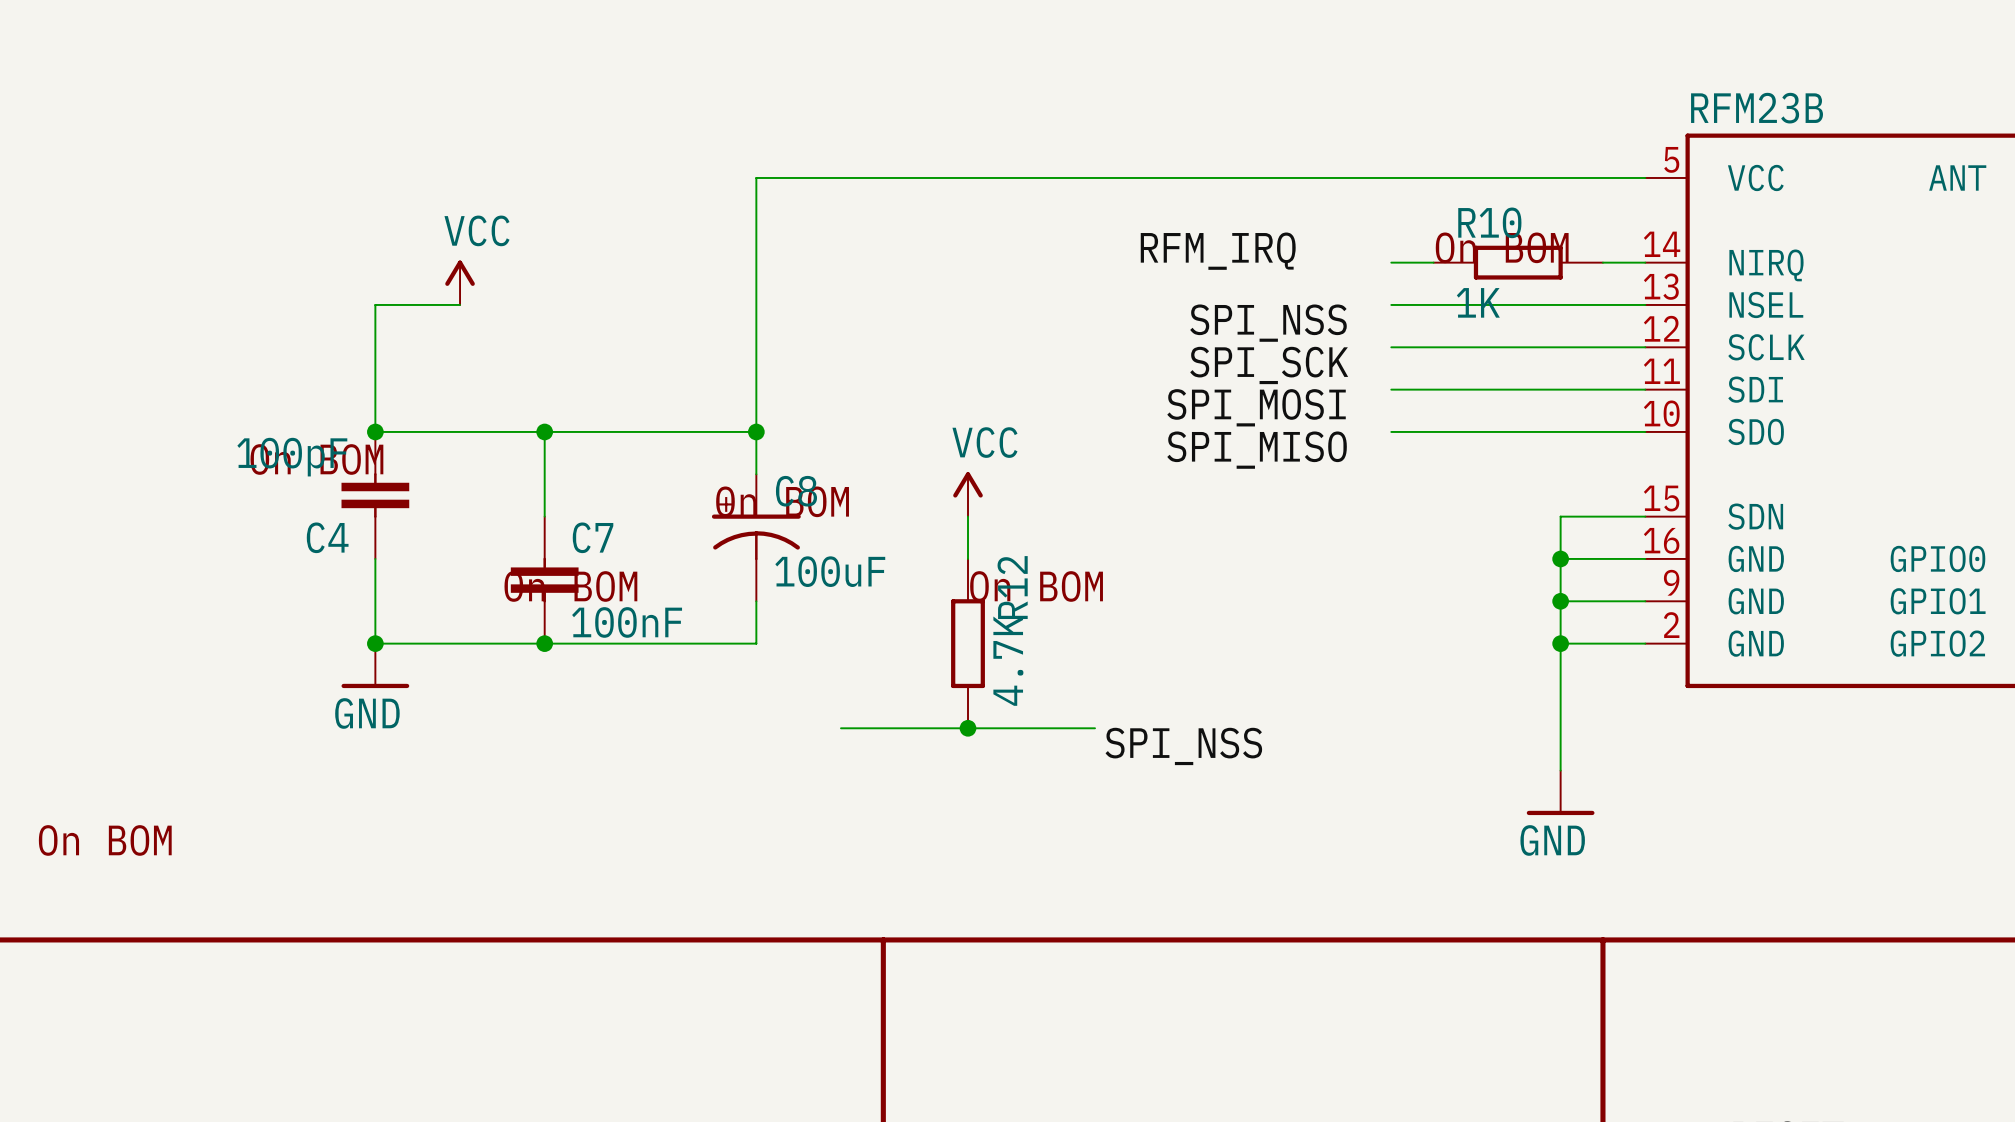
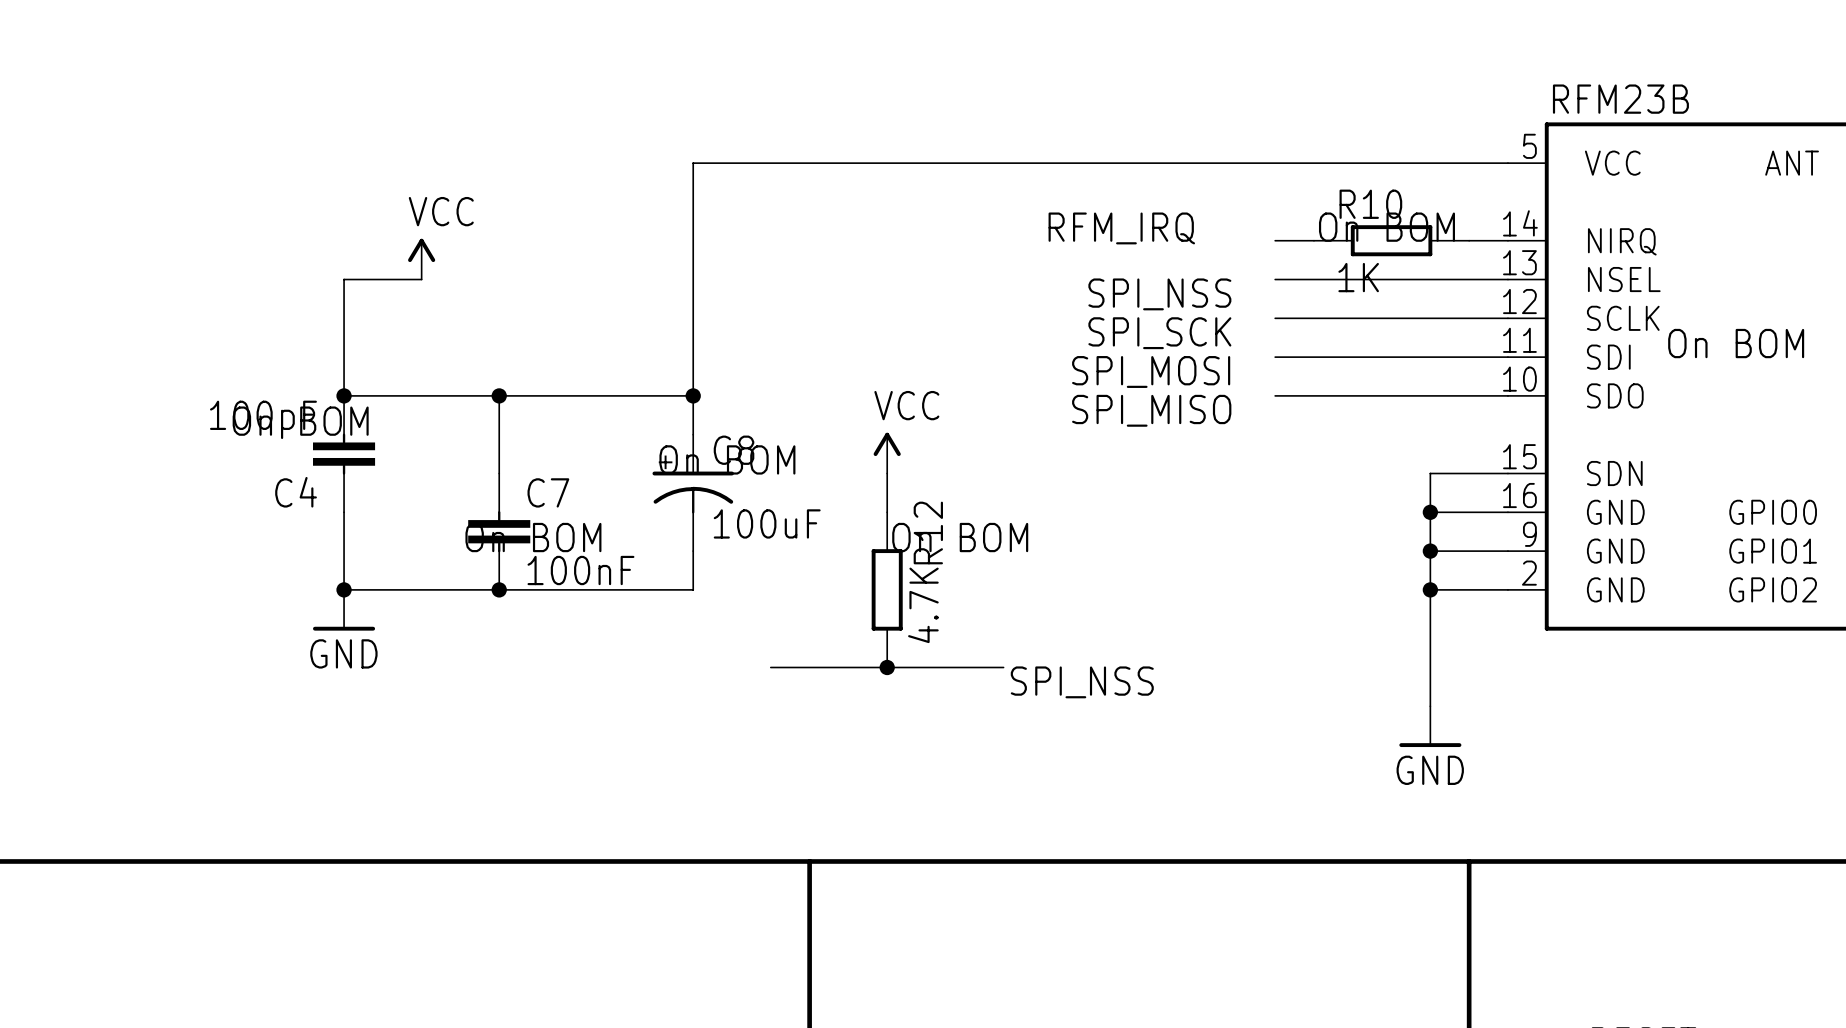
text: none -> On BOM (1736, 343)
text: On BOM (105, 840) -> none

